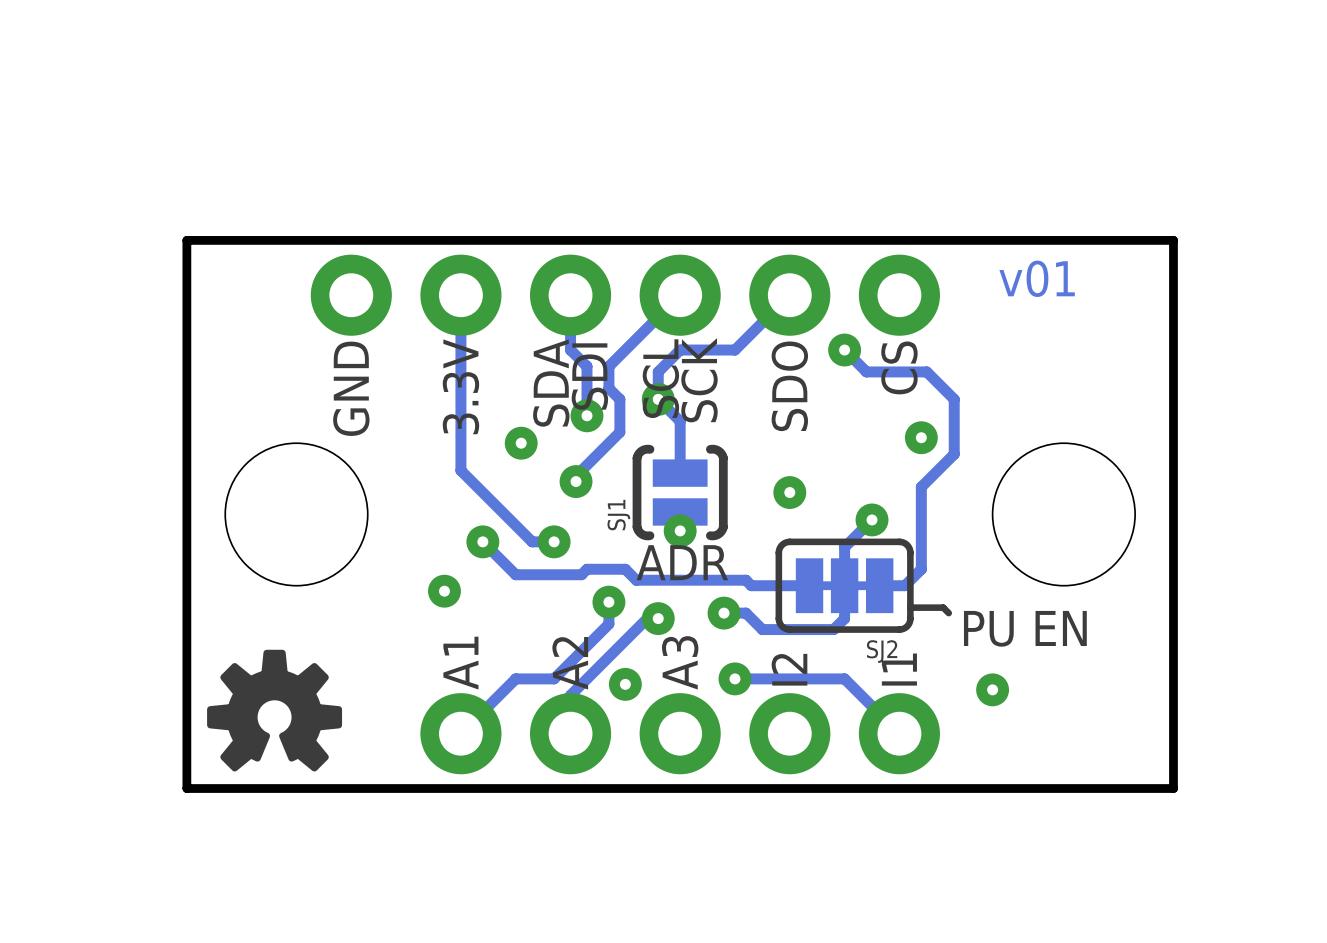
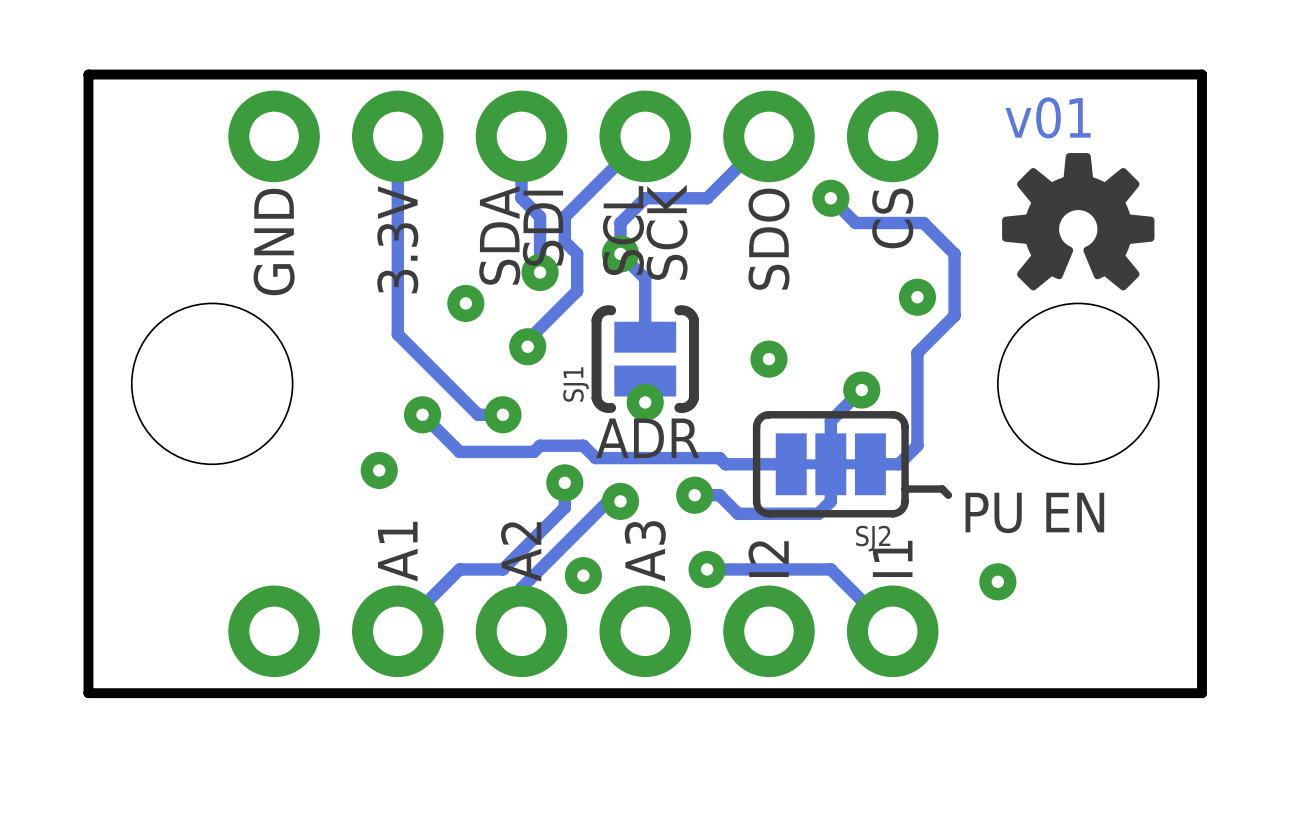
drawing position: (274, 710) -> (1078, 221)
part: none -> (583, 631)

